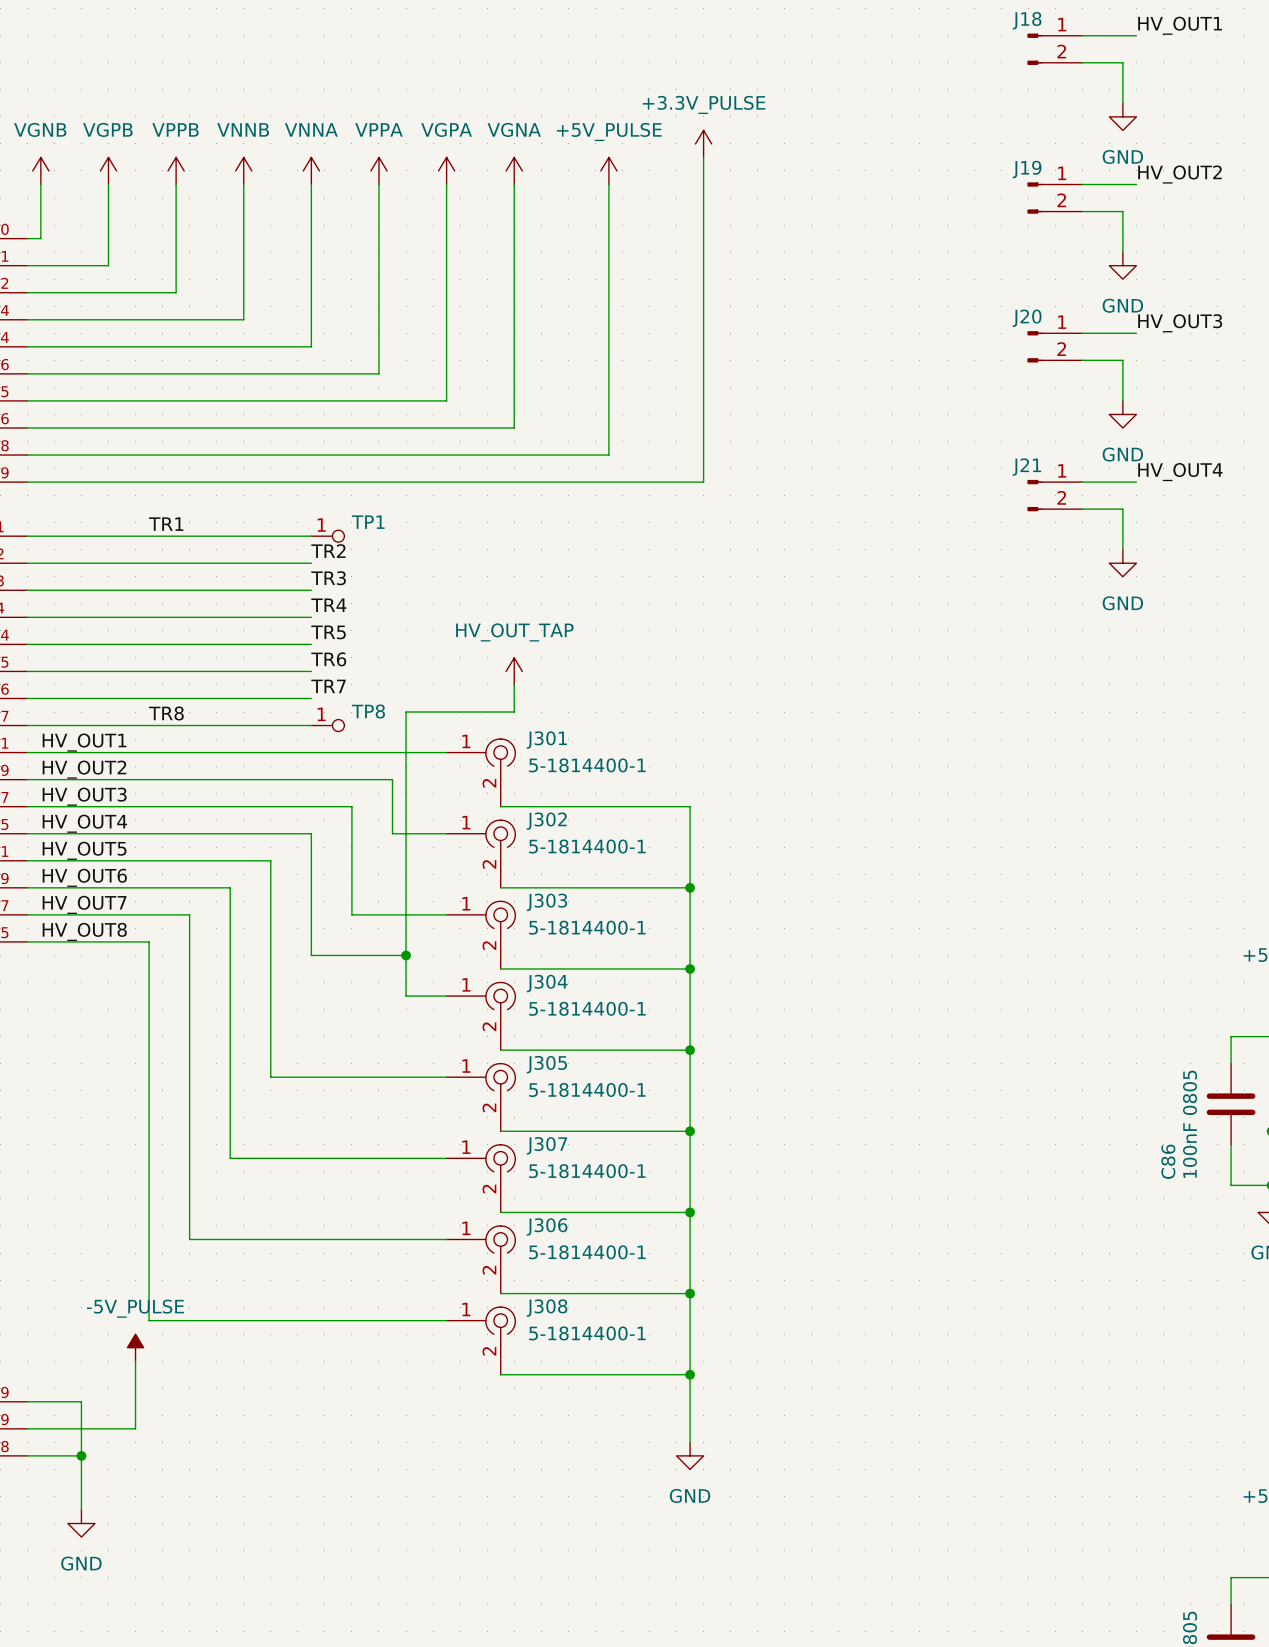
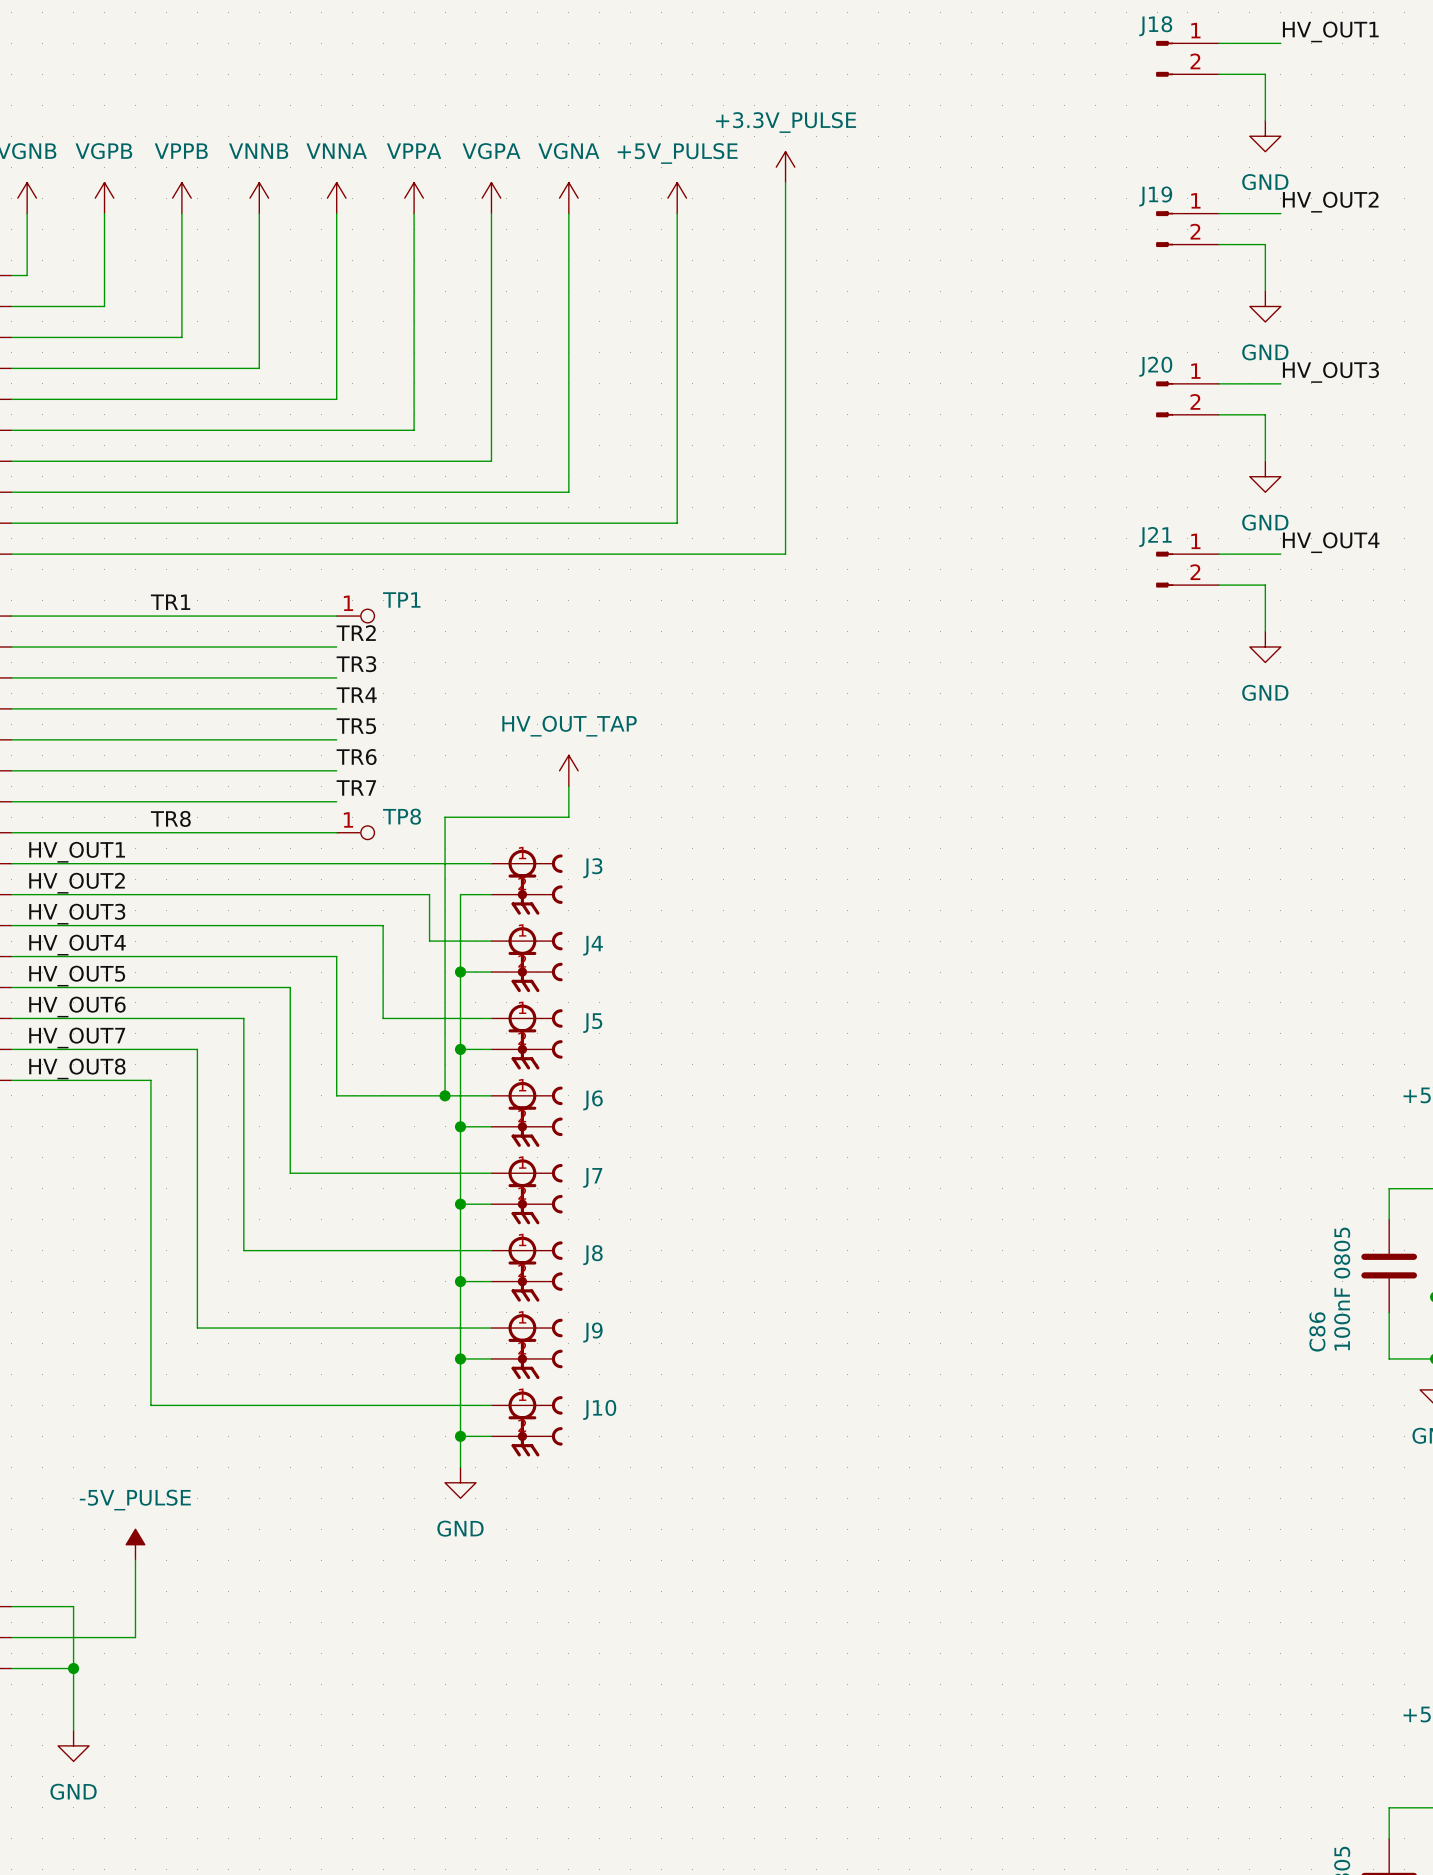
J3: none -> (527, 882)
J301: 5-1814400-1 (480, 772) -> none
wire: none -> (491, 894) (460, 894) (460, 1467)
wire: (500, 806) (690, 806) (690, 1442) -> none
wire: (392, 820) (392, 833) (446, 833) -> (429, 941) (491, 941)
J4: none -> (527, 959)
wire: none -> (460, 972) (491, 972)
junction: none -> (460, 972)
J302: 5-1814400-1 (480, 854) -> none
wire: (351, 887) (351, 914) (419, 914) -> (383, 1018) (491, 1018)
wire: (500, 887) (690, 887) -> none
junction: (690, 887) -> none
J5: none -> (527, 1037)
junction: none -> (460, 1049)
J303: 5-1814400-1 (480, 935) -> none
wire: (406, 955) (406, 996) (446, 996) -> (445, 1095) (491, 1095)
wire: (500, 968) (690, 968) -> none
junction: (690, 968) -> none
J6: none -> (527, 1114)
wire: none -> (460, 1126) (491, 1126)
junction: none -> (460, 1126)
J304: 5-1814400-1 (480, 1016) -> none
wire: (270, 1023) (270, 1077) (446, 1077) -> (290, 1173) (491, 1173)
J7: none -> (527, 1191)
wire: none -> (460, 1204) (491, 1204)
junction: none -> (460, 1204)
wire: (500, 1050) (690, 1050) -> none
junction: (690, 1050) -> none
wire: (230, 1090) (230, 1158) -> (197, 1328) (243, 1328)
wire: none -> (243, 1250) (491, 1250)
J305: 5-1814400-1 (480, 1097) -> none
J8: none -> (527, 1269)
wire: none -> (460, 1281) (491, 1281)
junction: none -> (460, 1281)
wire: (500, 1131) (690, 1131) -> none
junction: (690, 1131) -> none
wire: (189, 1158) (189, 1239) (446, 1239) -> none
J9: none -> (527, 1346)
J307: 5-1814400-1 (480, 1178) -> none
wire: none -> (460, 1358) (491, 1358)
junction: none -> (460, 1358)
wire: (500, 1212) (690, 1212) -> none
junction: (690, 1212) -> none
wire: (149, 1225) (149, 1320) (446, 1320) -> (150, 1405) (491, 1405)
J10: none -> (527, 1423)
wire: none -> (460, 1436) (491, 1436)
junction: none -> (460, 1436)
J306: 5-1814400-1 (480, 1259) -> none
power symbol: none -> GND (460, 1482)
wire: (500, 1293) (690, 1293) -> none
junction: (690, 1293) -> none
J308: 5-1814400-1 (480, 1340) -> none
wire: (500, 1374) (690, 1374) -> none
junction: (690, 1374) -> none
power symbol: GND (690, 1455) -> none

